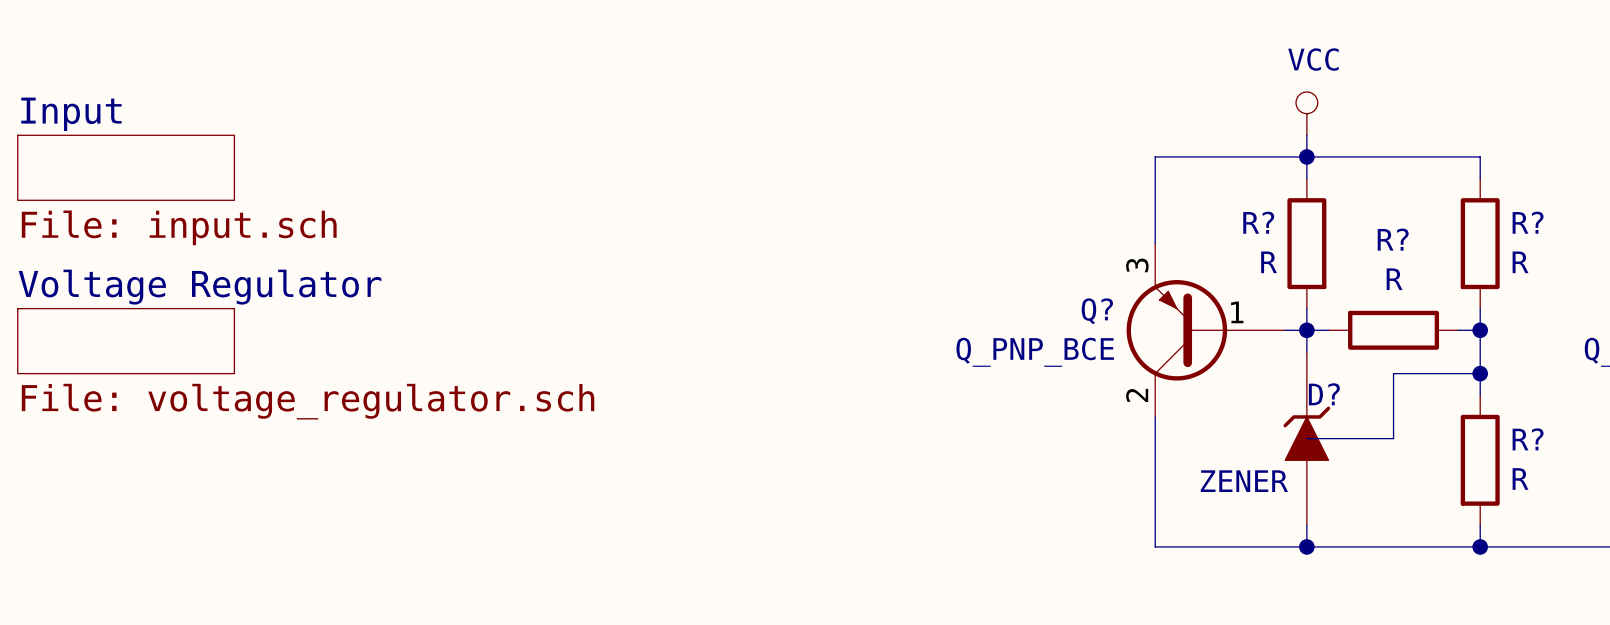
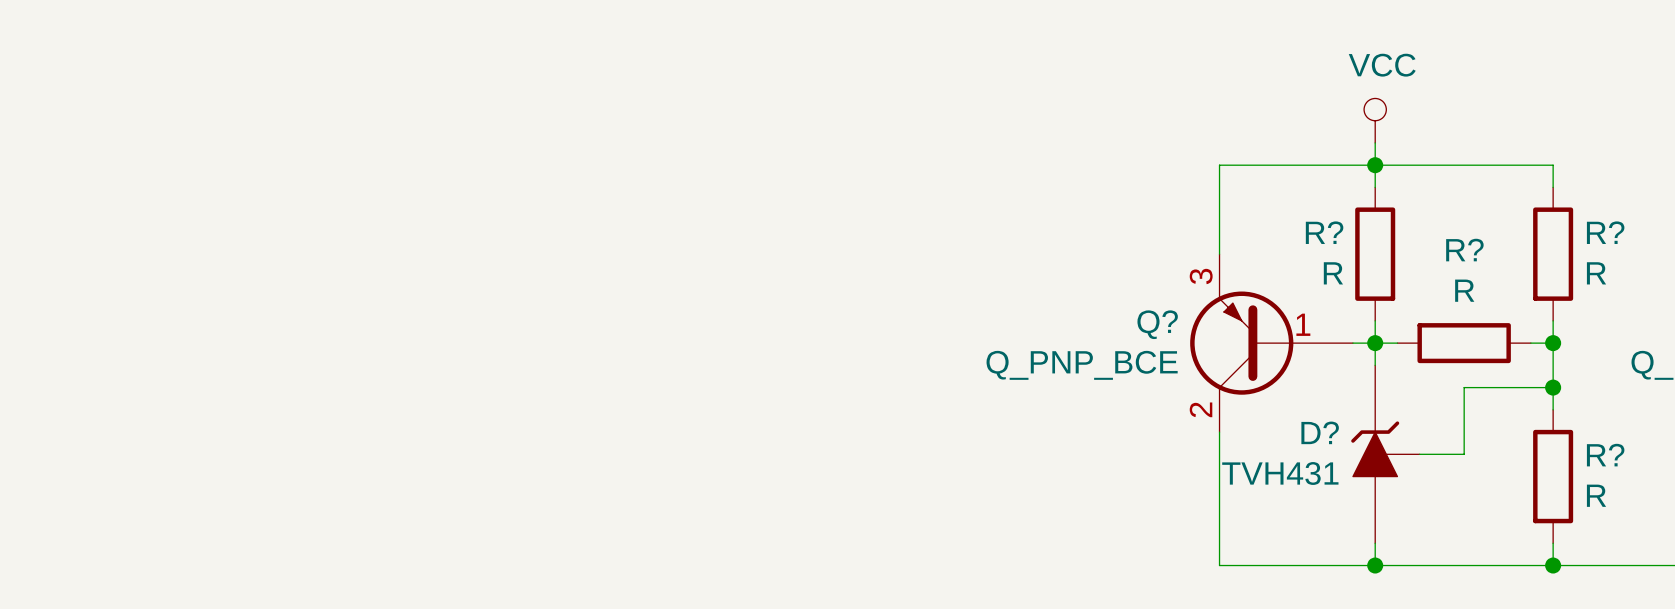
sheet Input: File: input.sch (126, 167) -> none
sheet Voltage Regulator: File: voltage_regulator.sch (126, 341) -> none
D? symbol: [1283, 351, 1331, 526] -> [1351, 365, 1420, 544]
D? name position: D? (1324, 394) -> D? (1320, 432)
D? value: ZENER (1244, 481) -> TVH431 (1280, 473)

